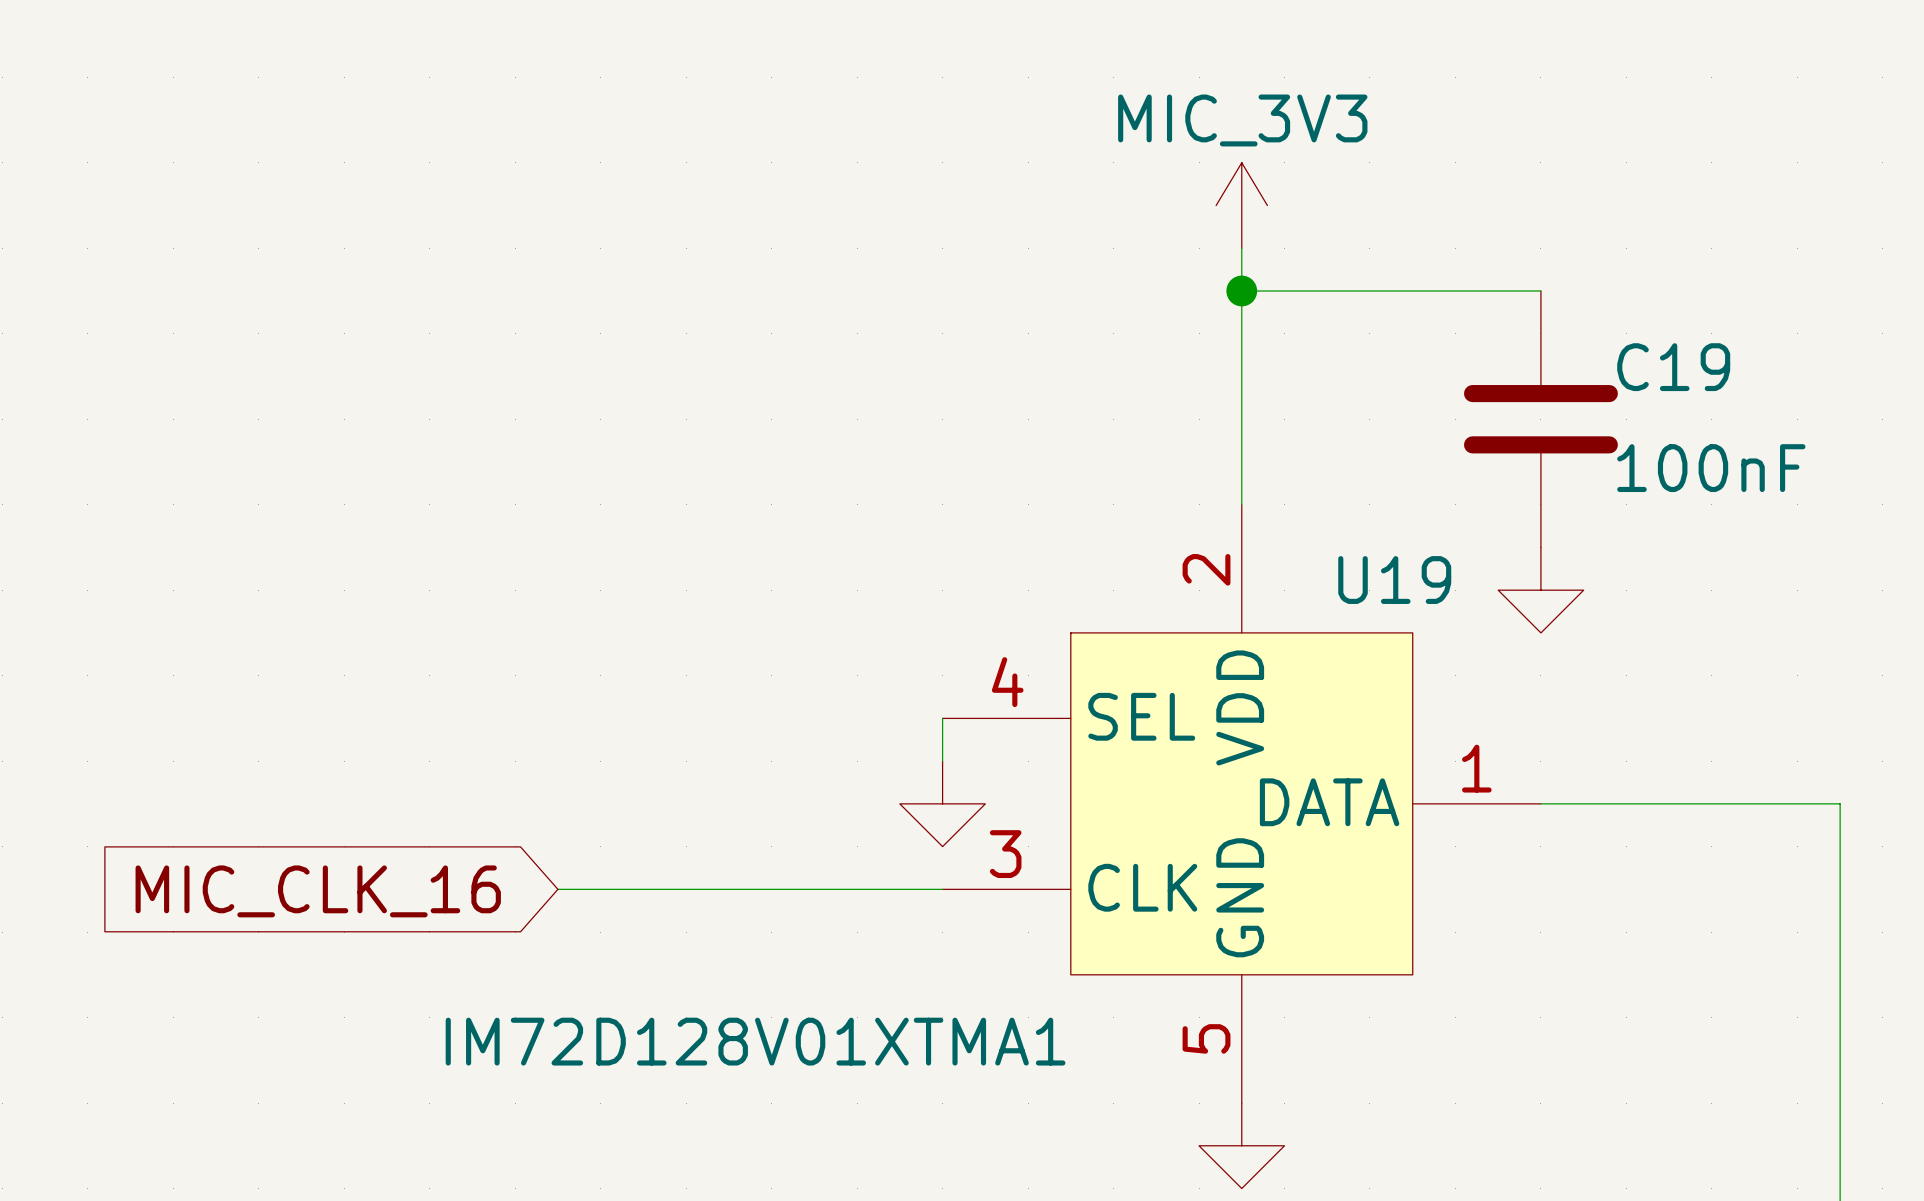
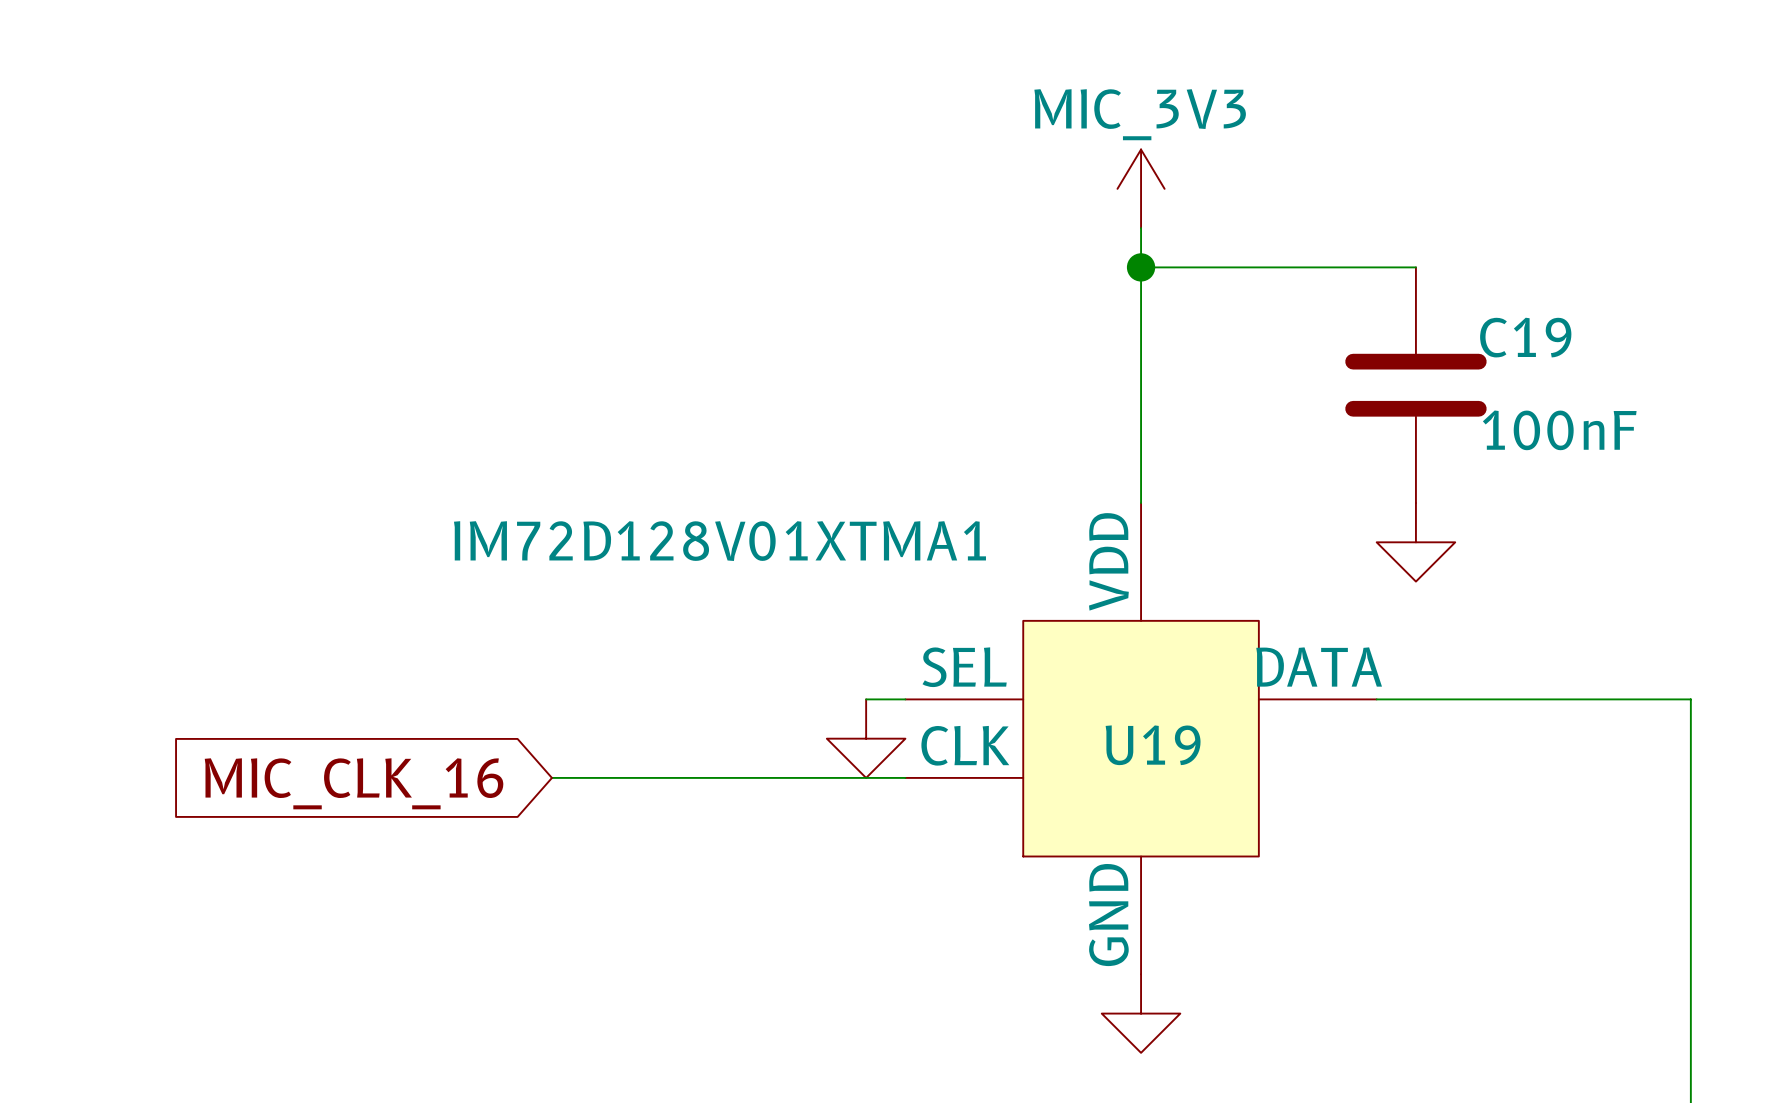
U19 symbol: [942, 504, 1541, 1104] -> [905, 503, 1377, 975]
U19 name position: U19 (1394, 580) -> U19 (1153, 745)
wire: (942, 718) (942, 761) -> (905, 699) (866, 699)
wire: (1540, 803) (1840, 803) -> (1376, 699) (1690, 699) (1690, 738)
wire: (557, 889) (942, 889) -> (551, 777) (905, 777)
global label position: MIC_CLK_16 (318, 891) -> MIC_CLK_16 (354, 783)
U19 value position: IM72D128V01XTMA1 (755, 1041) -> IM72D128V01XTMA1 (719, 541)
power symbol position: (1241, 1145) -> (1141, 1013)

